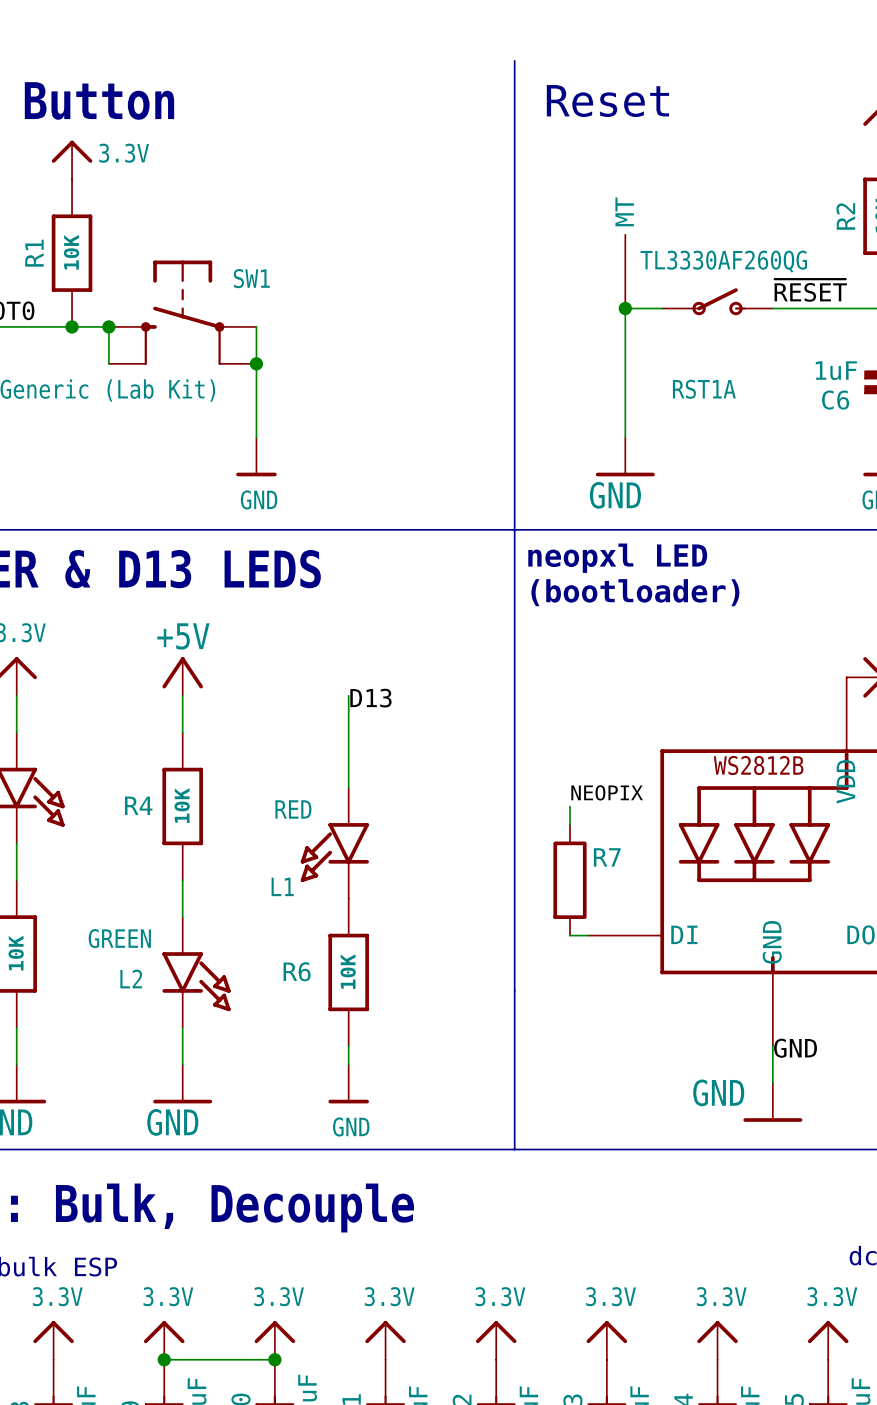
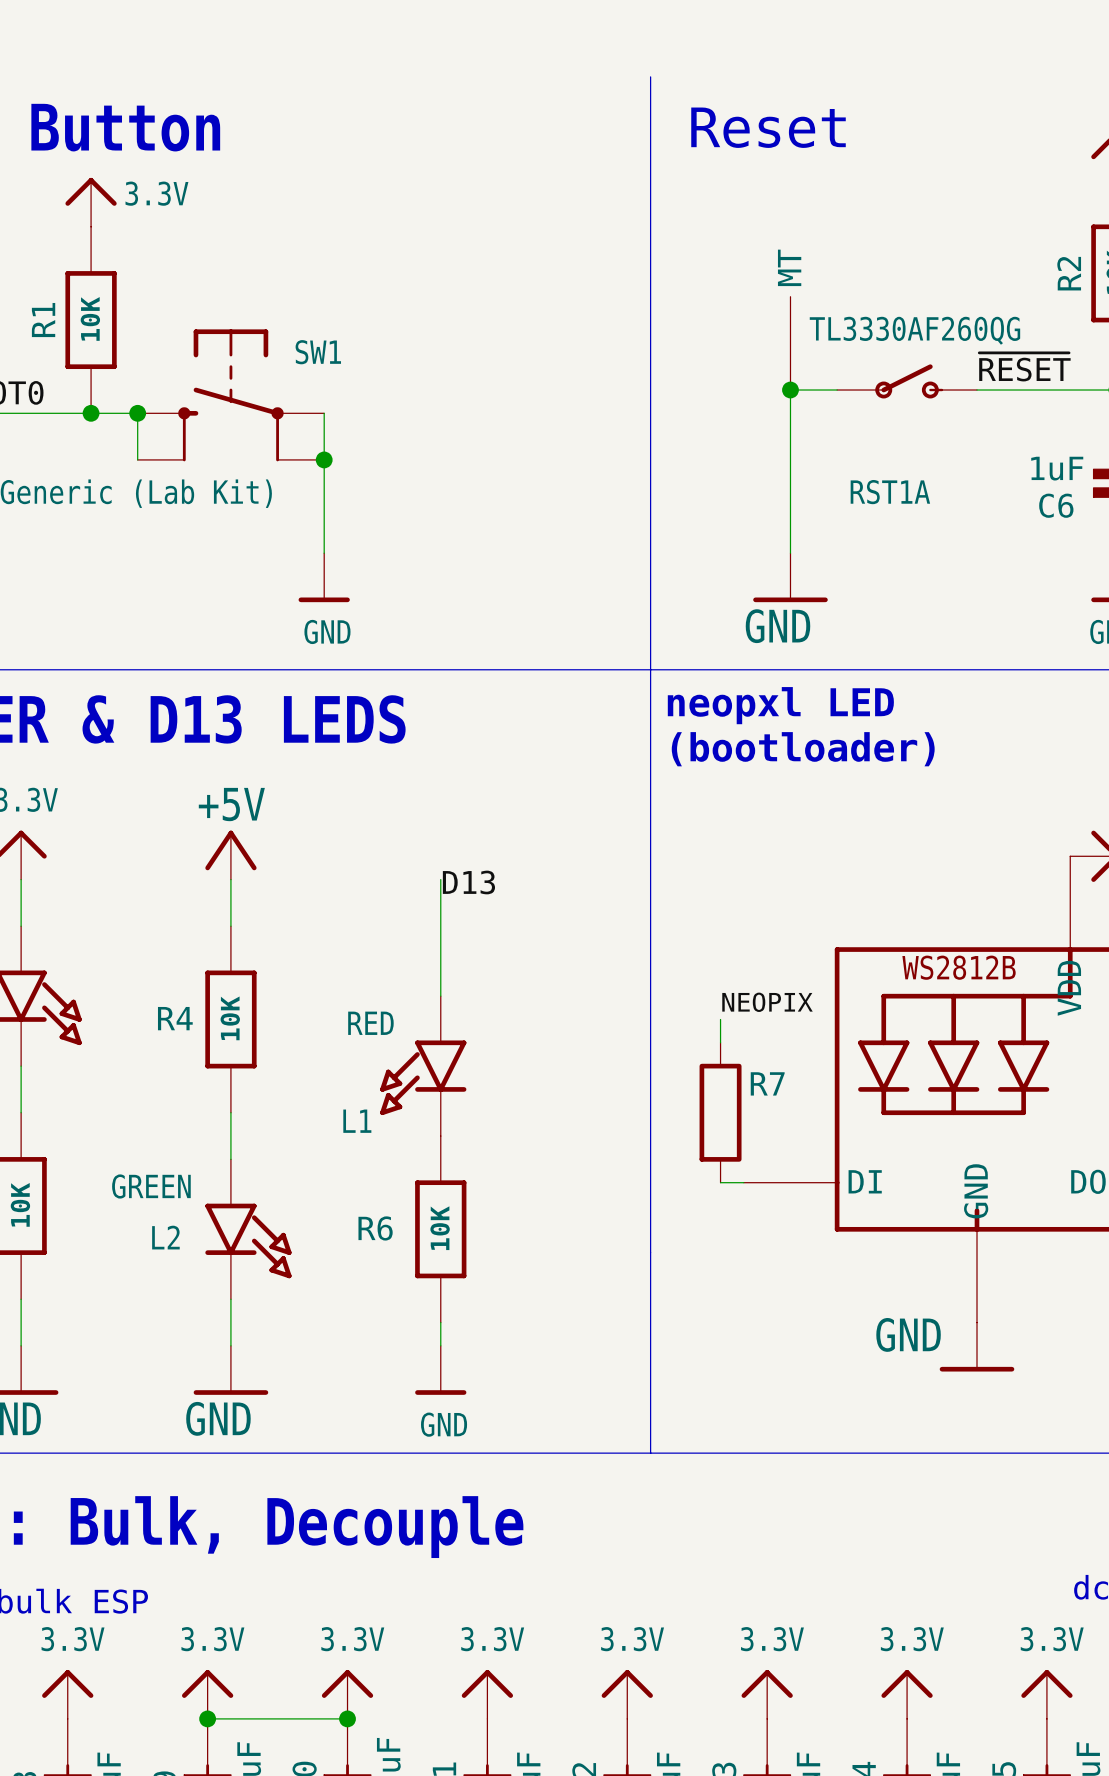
label: GND (795, 1048) -> none
power symbol position: GND (772, 1102) -> GND (977, 1347)

